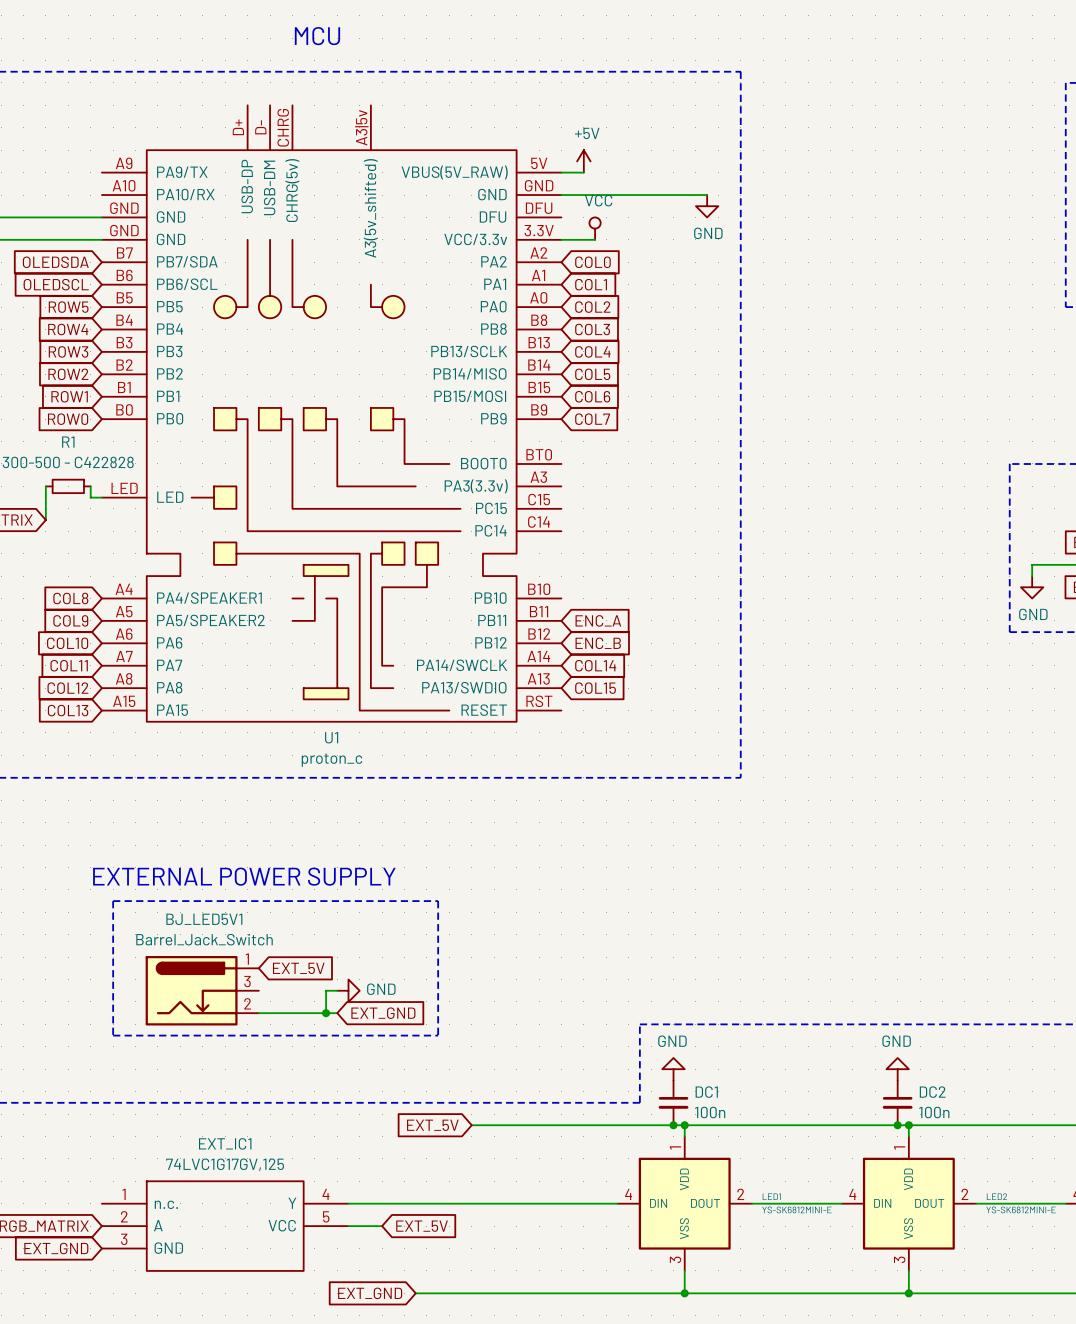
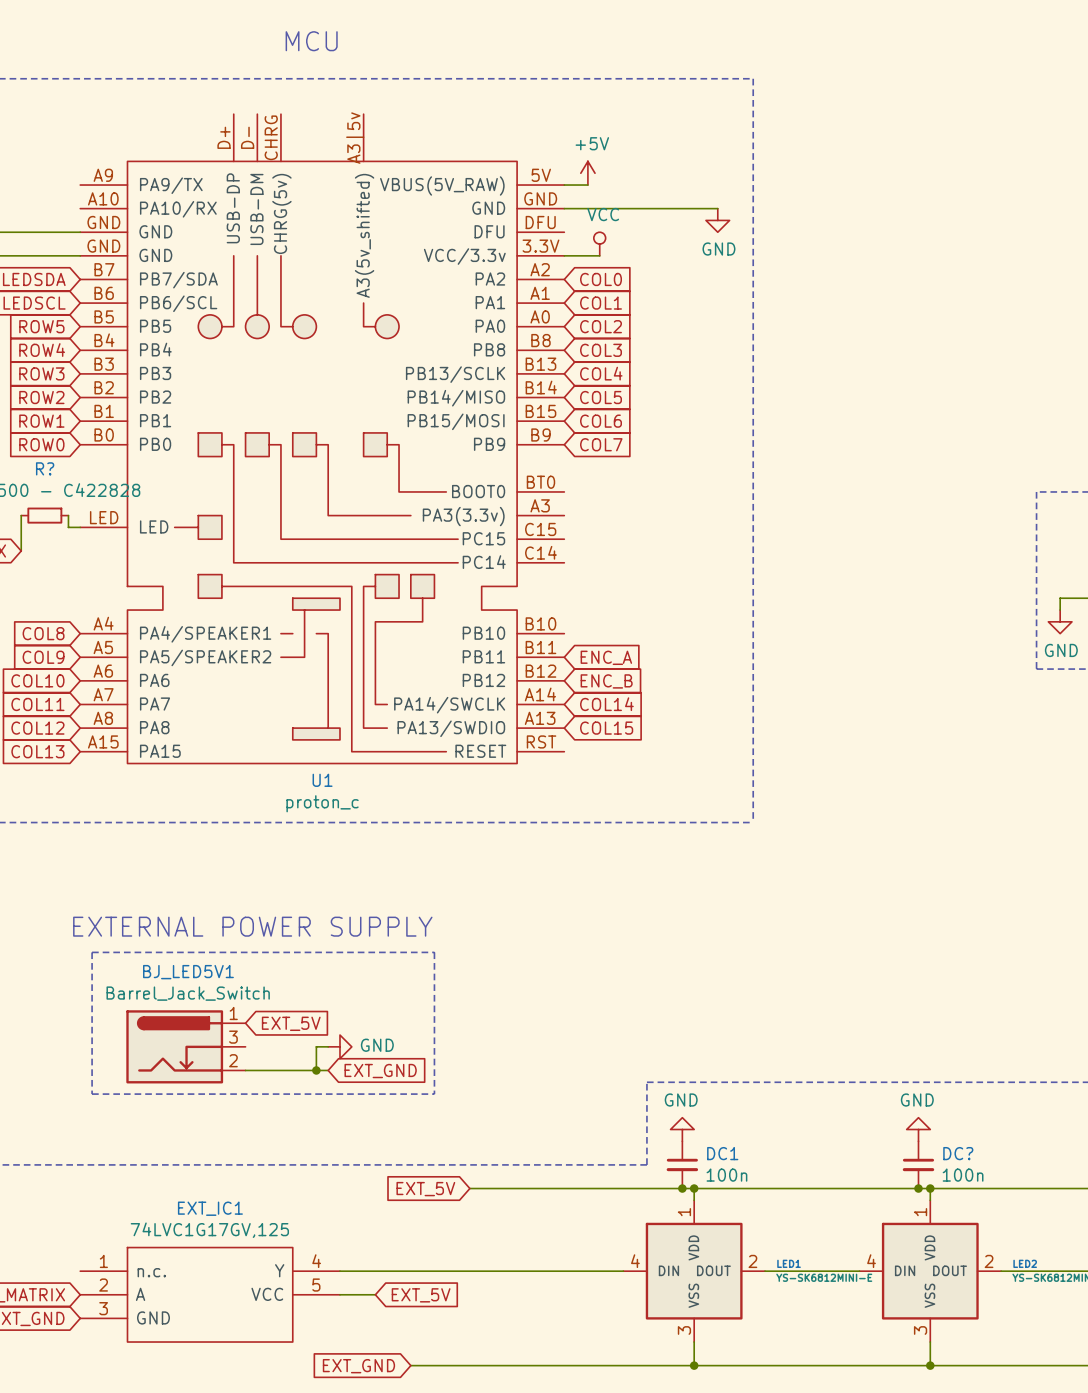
R1 name: R1 (68, 442) -> R? (45, 468)
DC2 name: DC2 (932, 1092) -> DC? (958, 1153)

